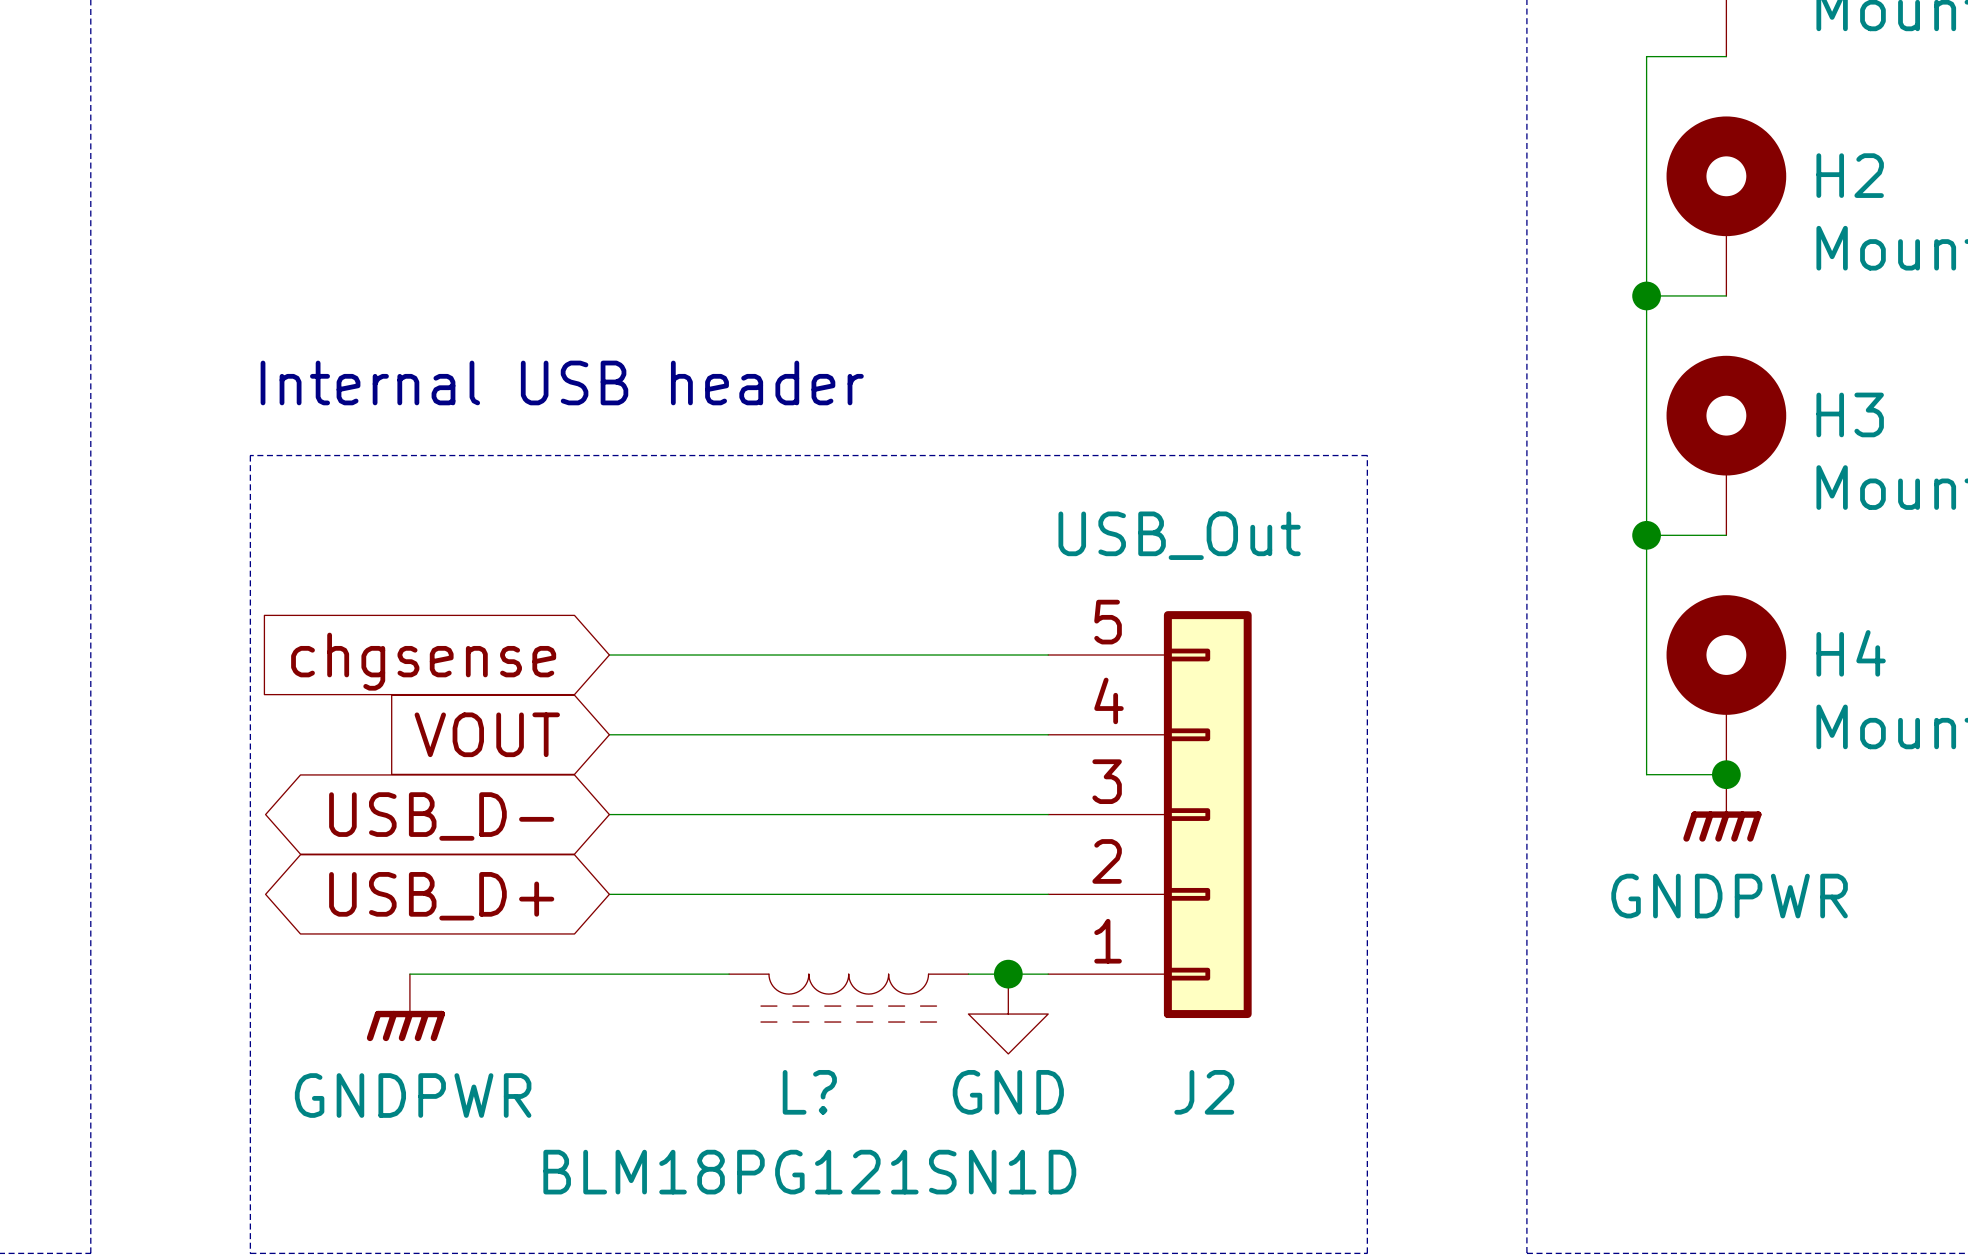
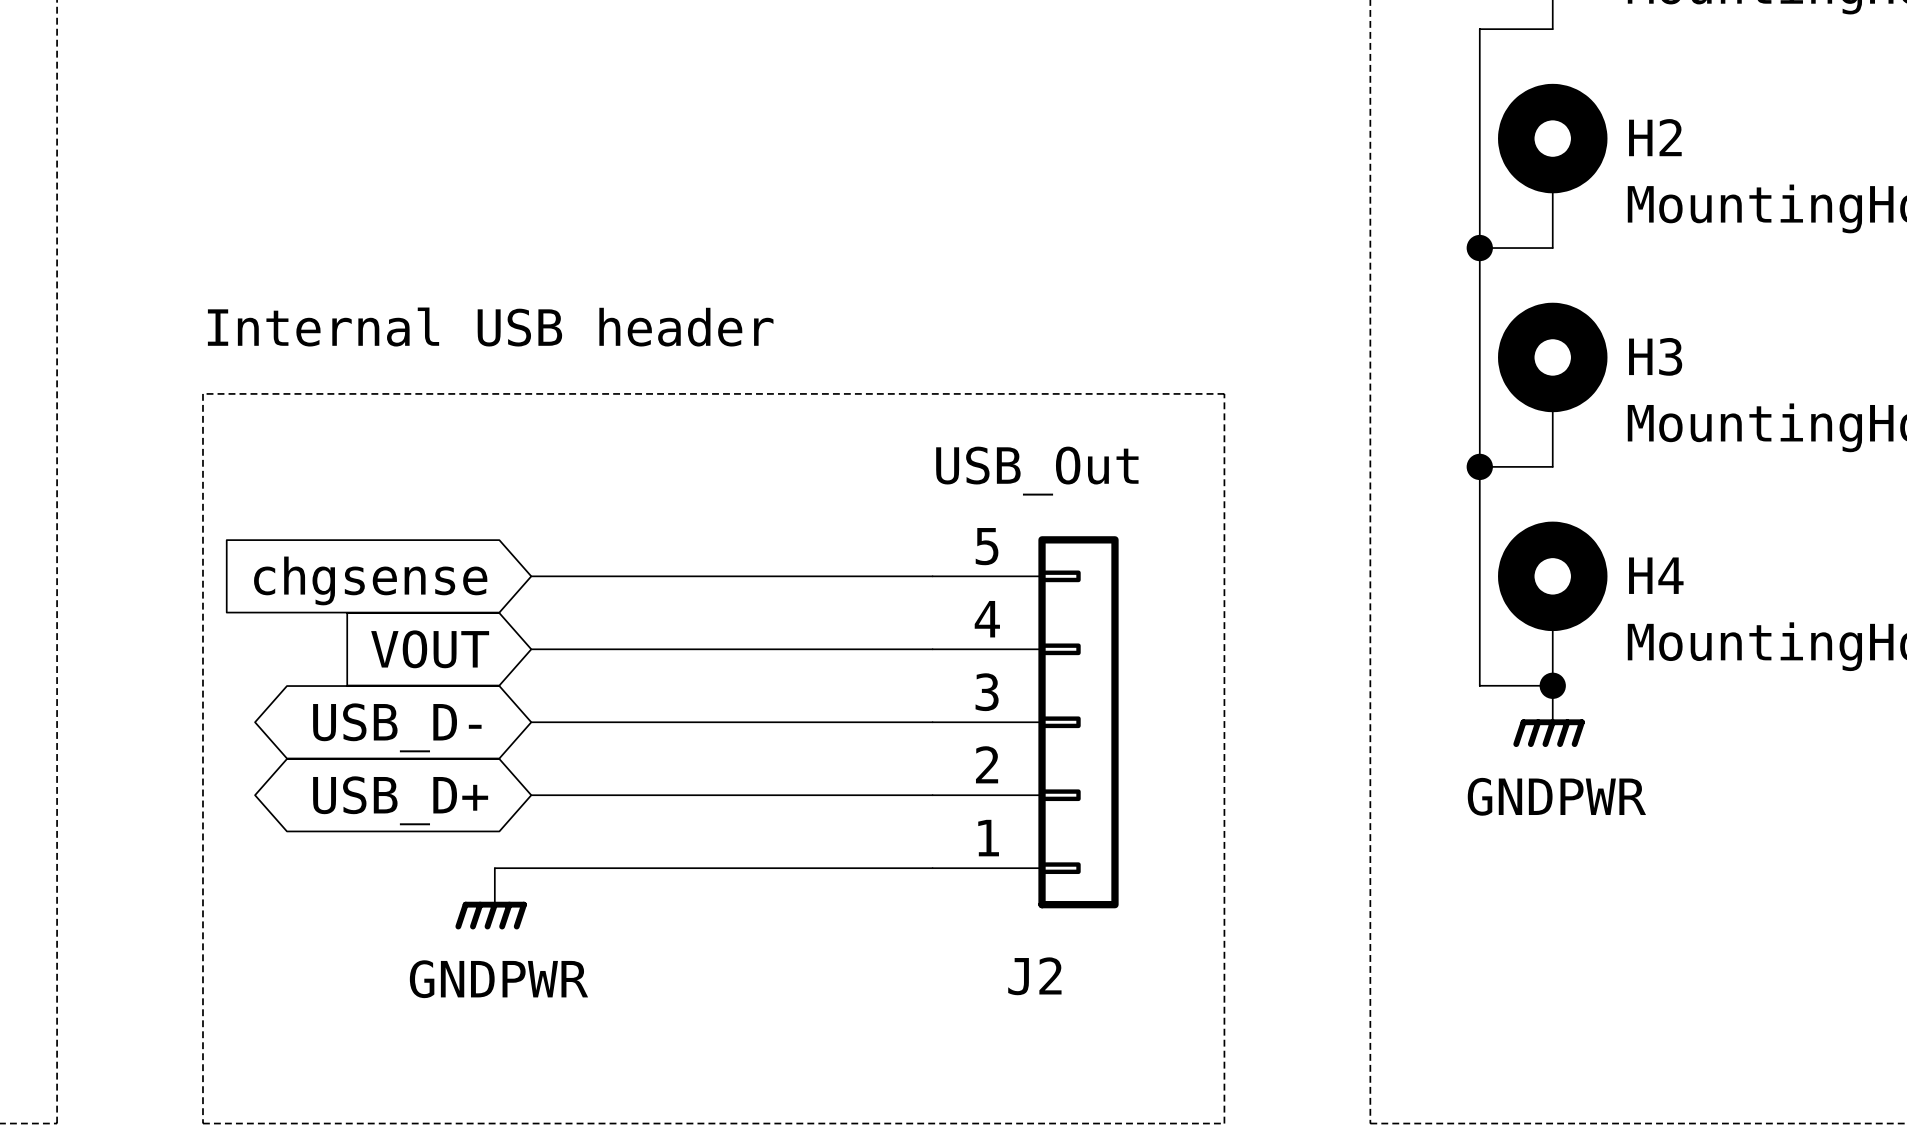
wire: (409, 974) (569, 974) -> none
wire: none -> (640, 868) (859, 868)
junction: (1008, 974) -> none
L?: BLM18PG121SN1D (848, 998) -> none
power symbol position: GNDPWR (405, 1007) -> GNDPWR (491, 898)
power symbol: GND (1008, 1014) -> none
J2 name position: J2 (1204, 1092) -> J2 (1034, 976)

